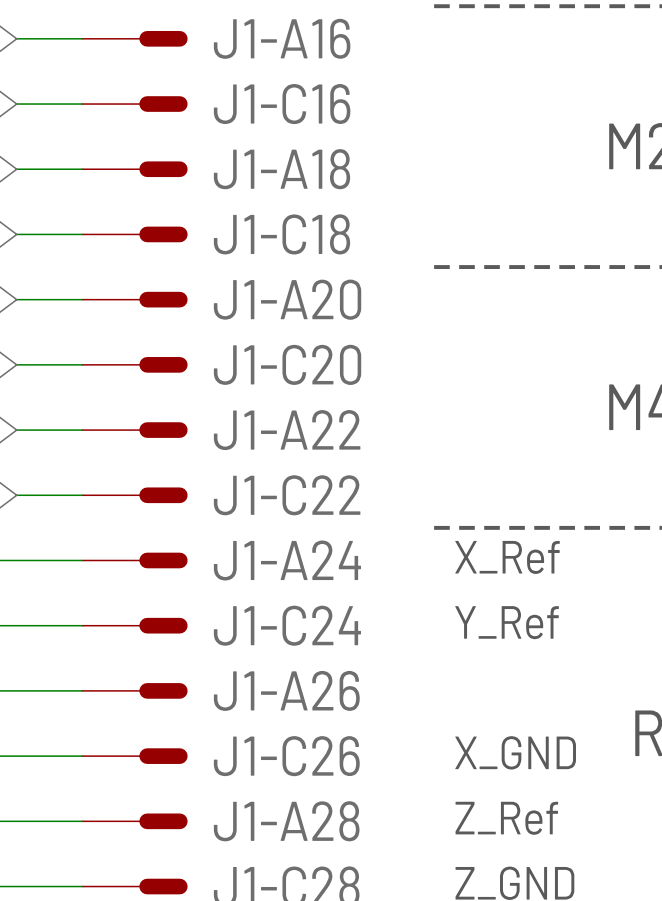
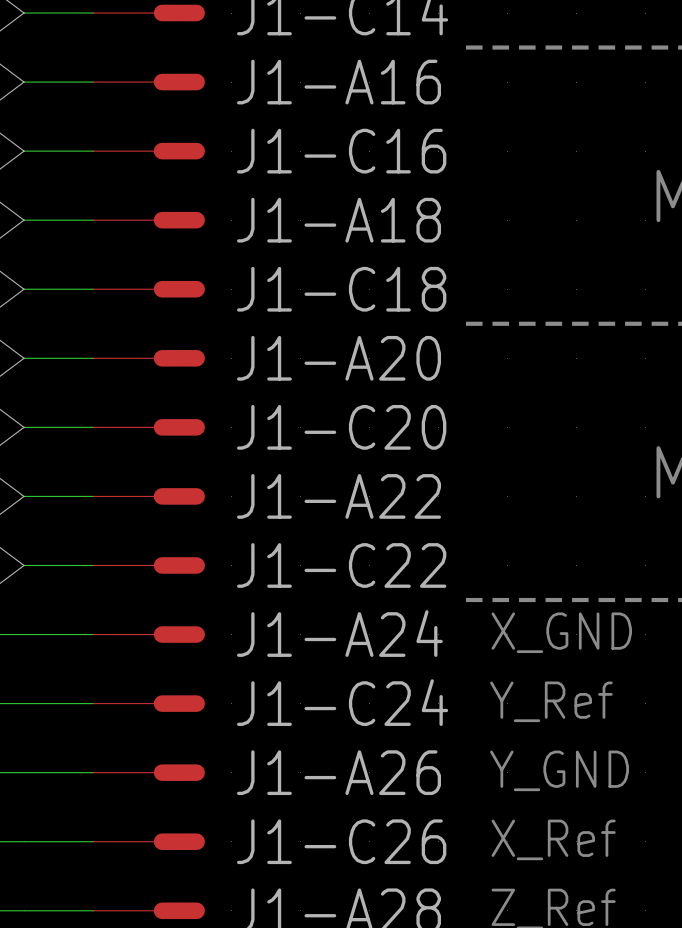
text: X_Ref (507, 557) -> X_GND (561, 632)
text: none -> Y_GND (559, 770)
text: X_GND (515, 752) -> X_Ref (553, 839)

